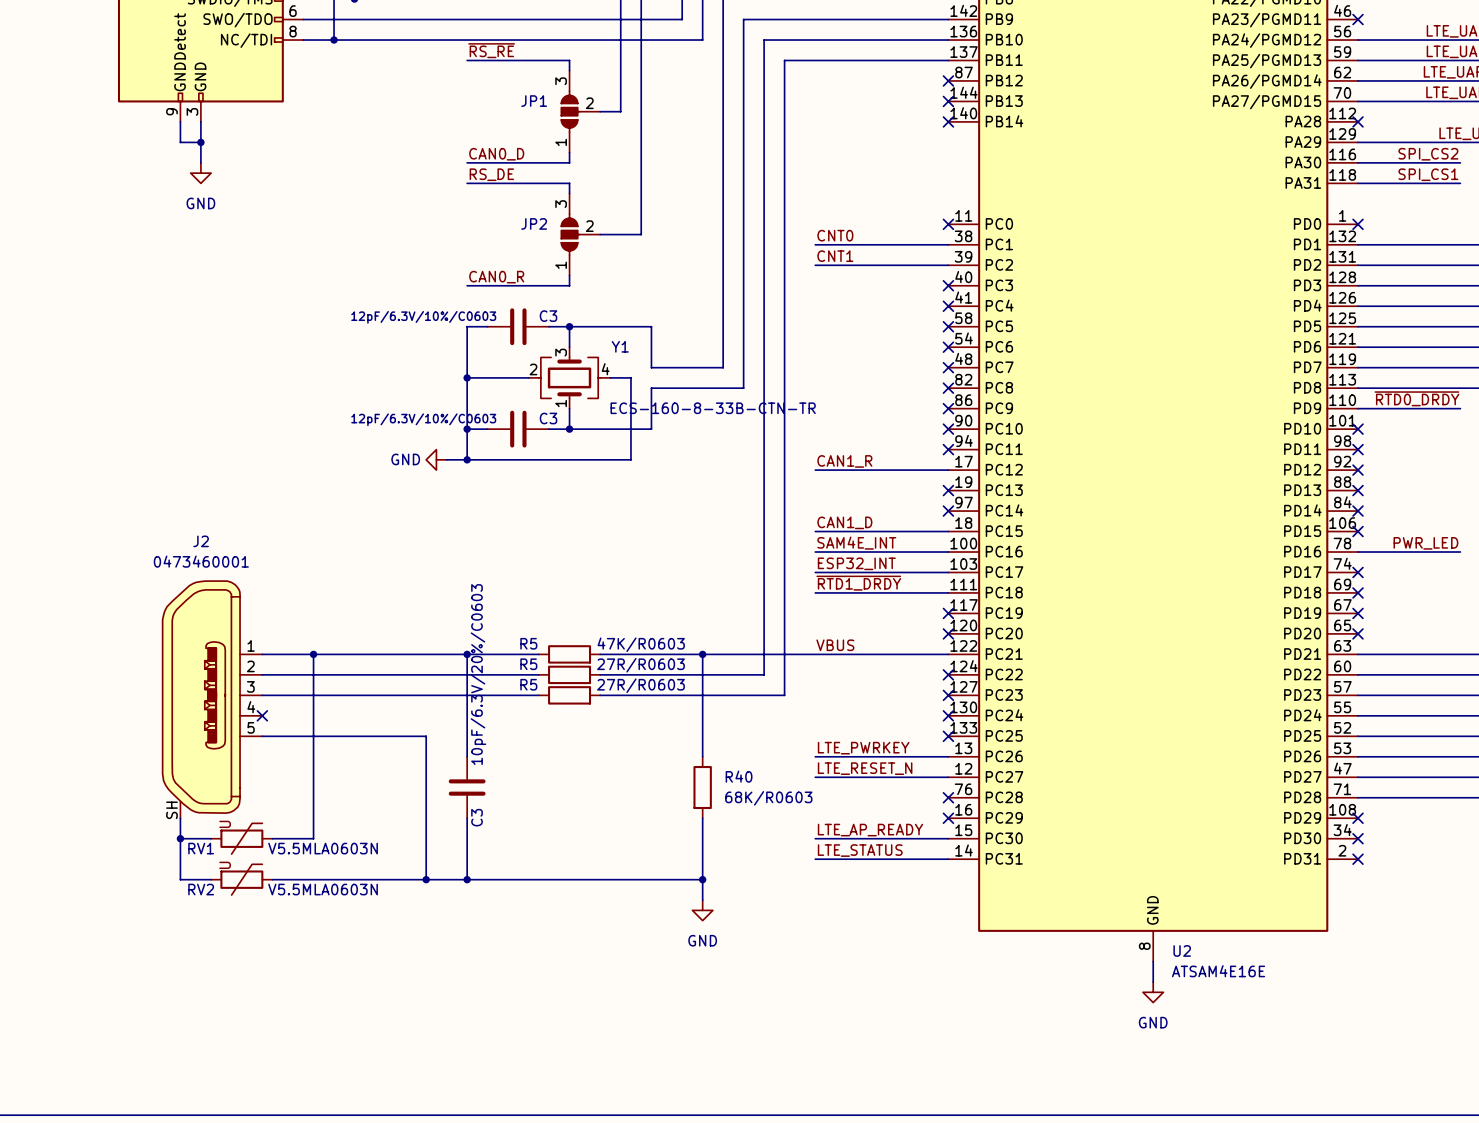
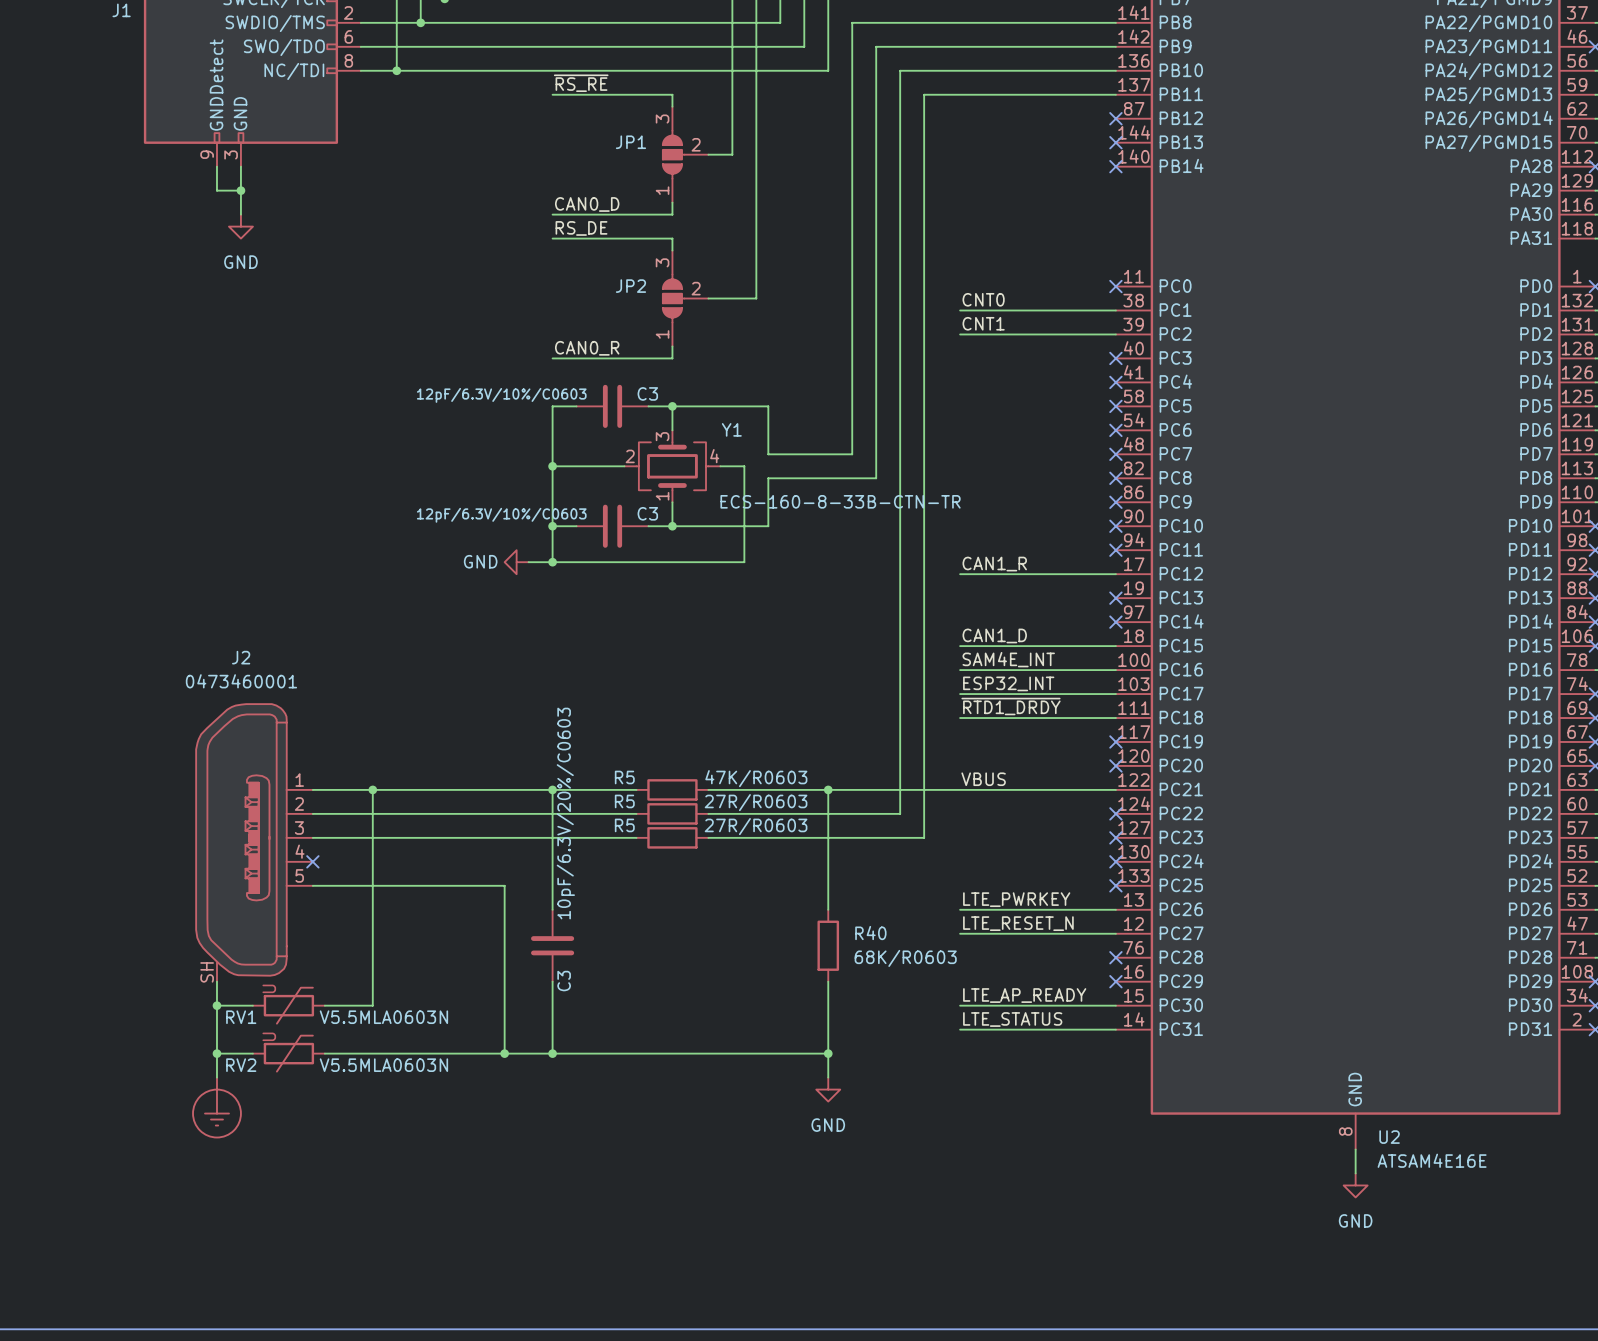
wire: none -> (216, 1053) (216, 1077)
junction: none -> (216, 1053)
power symbol: none -> (216, 1107)

